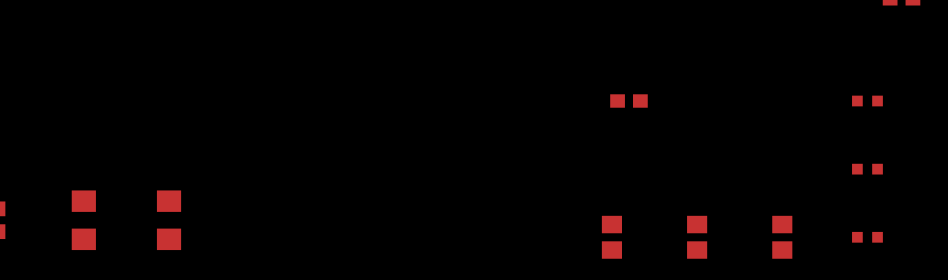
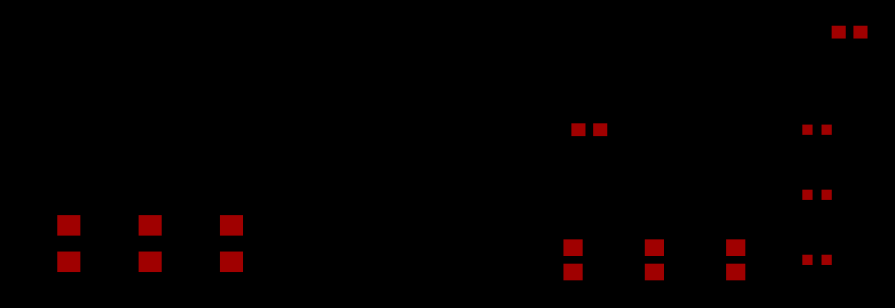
part: none -> (231, 243)

